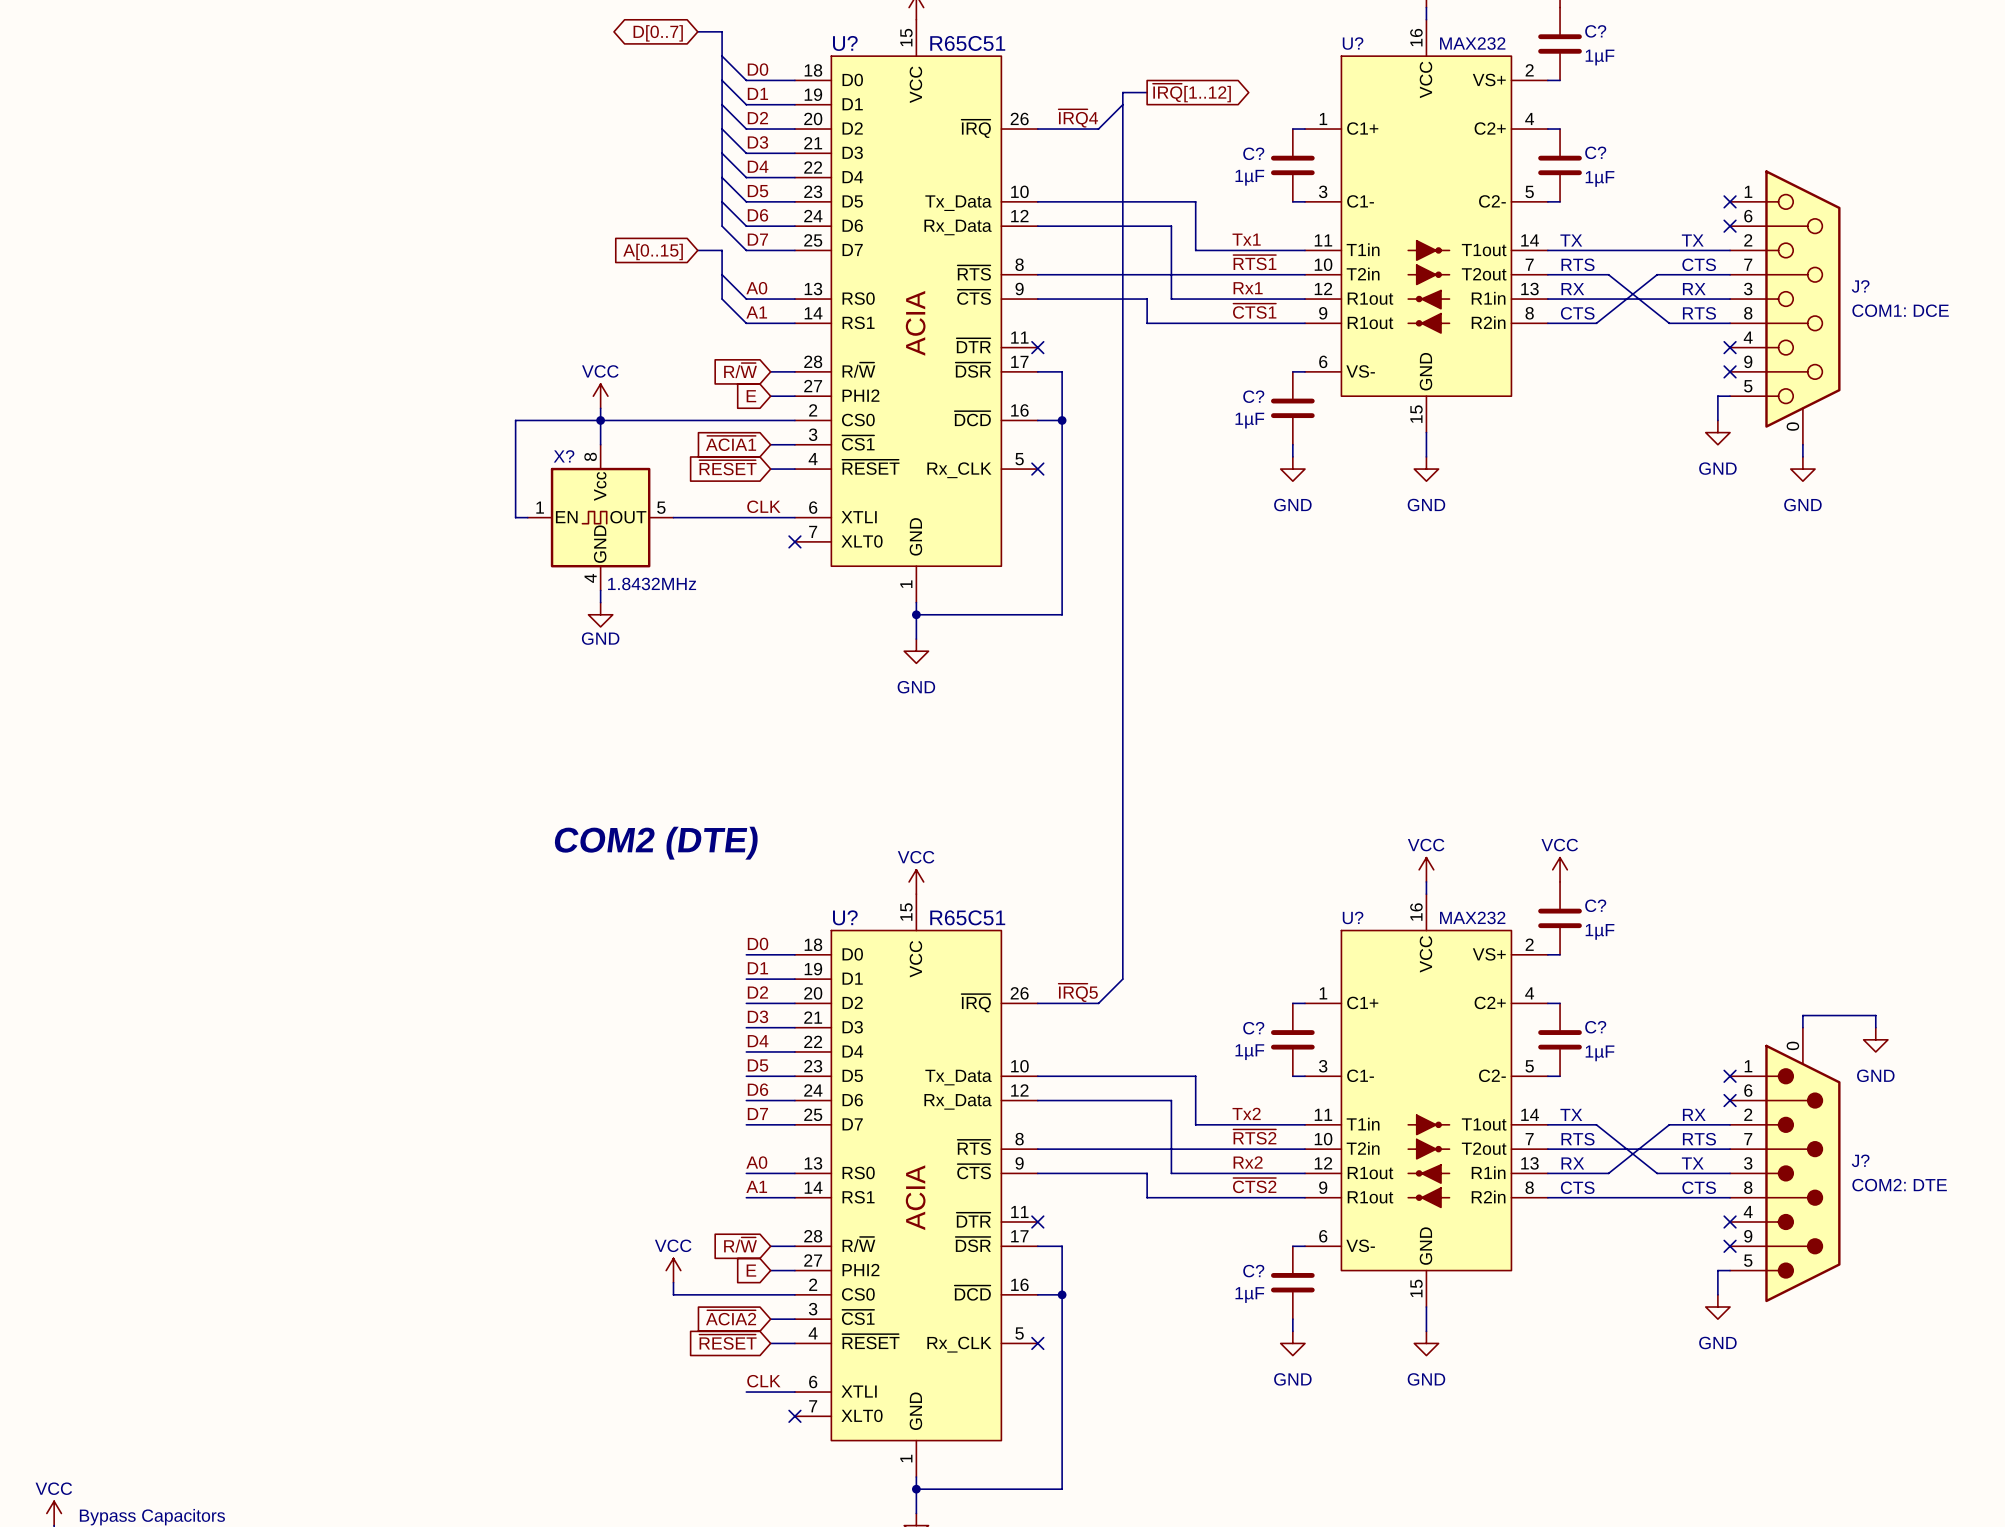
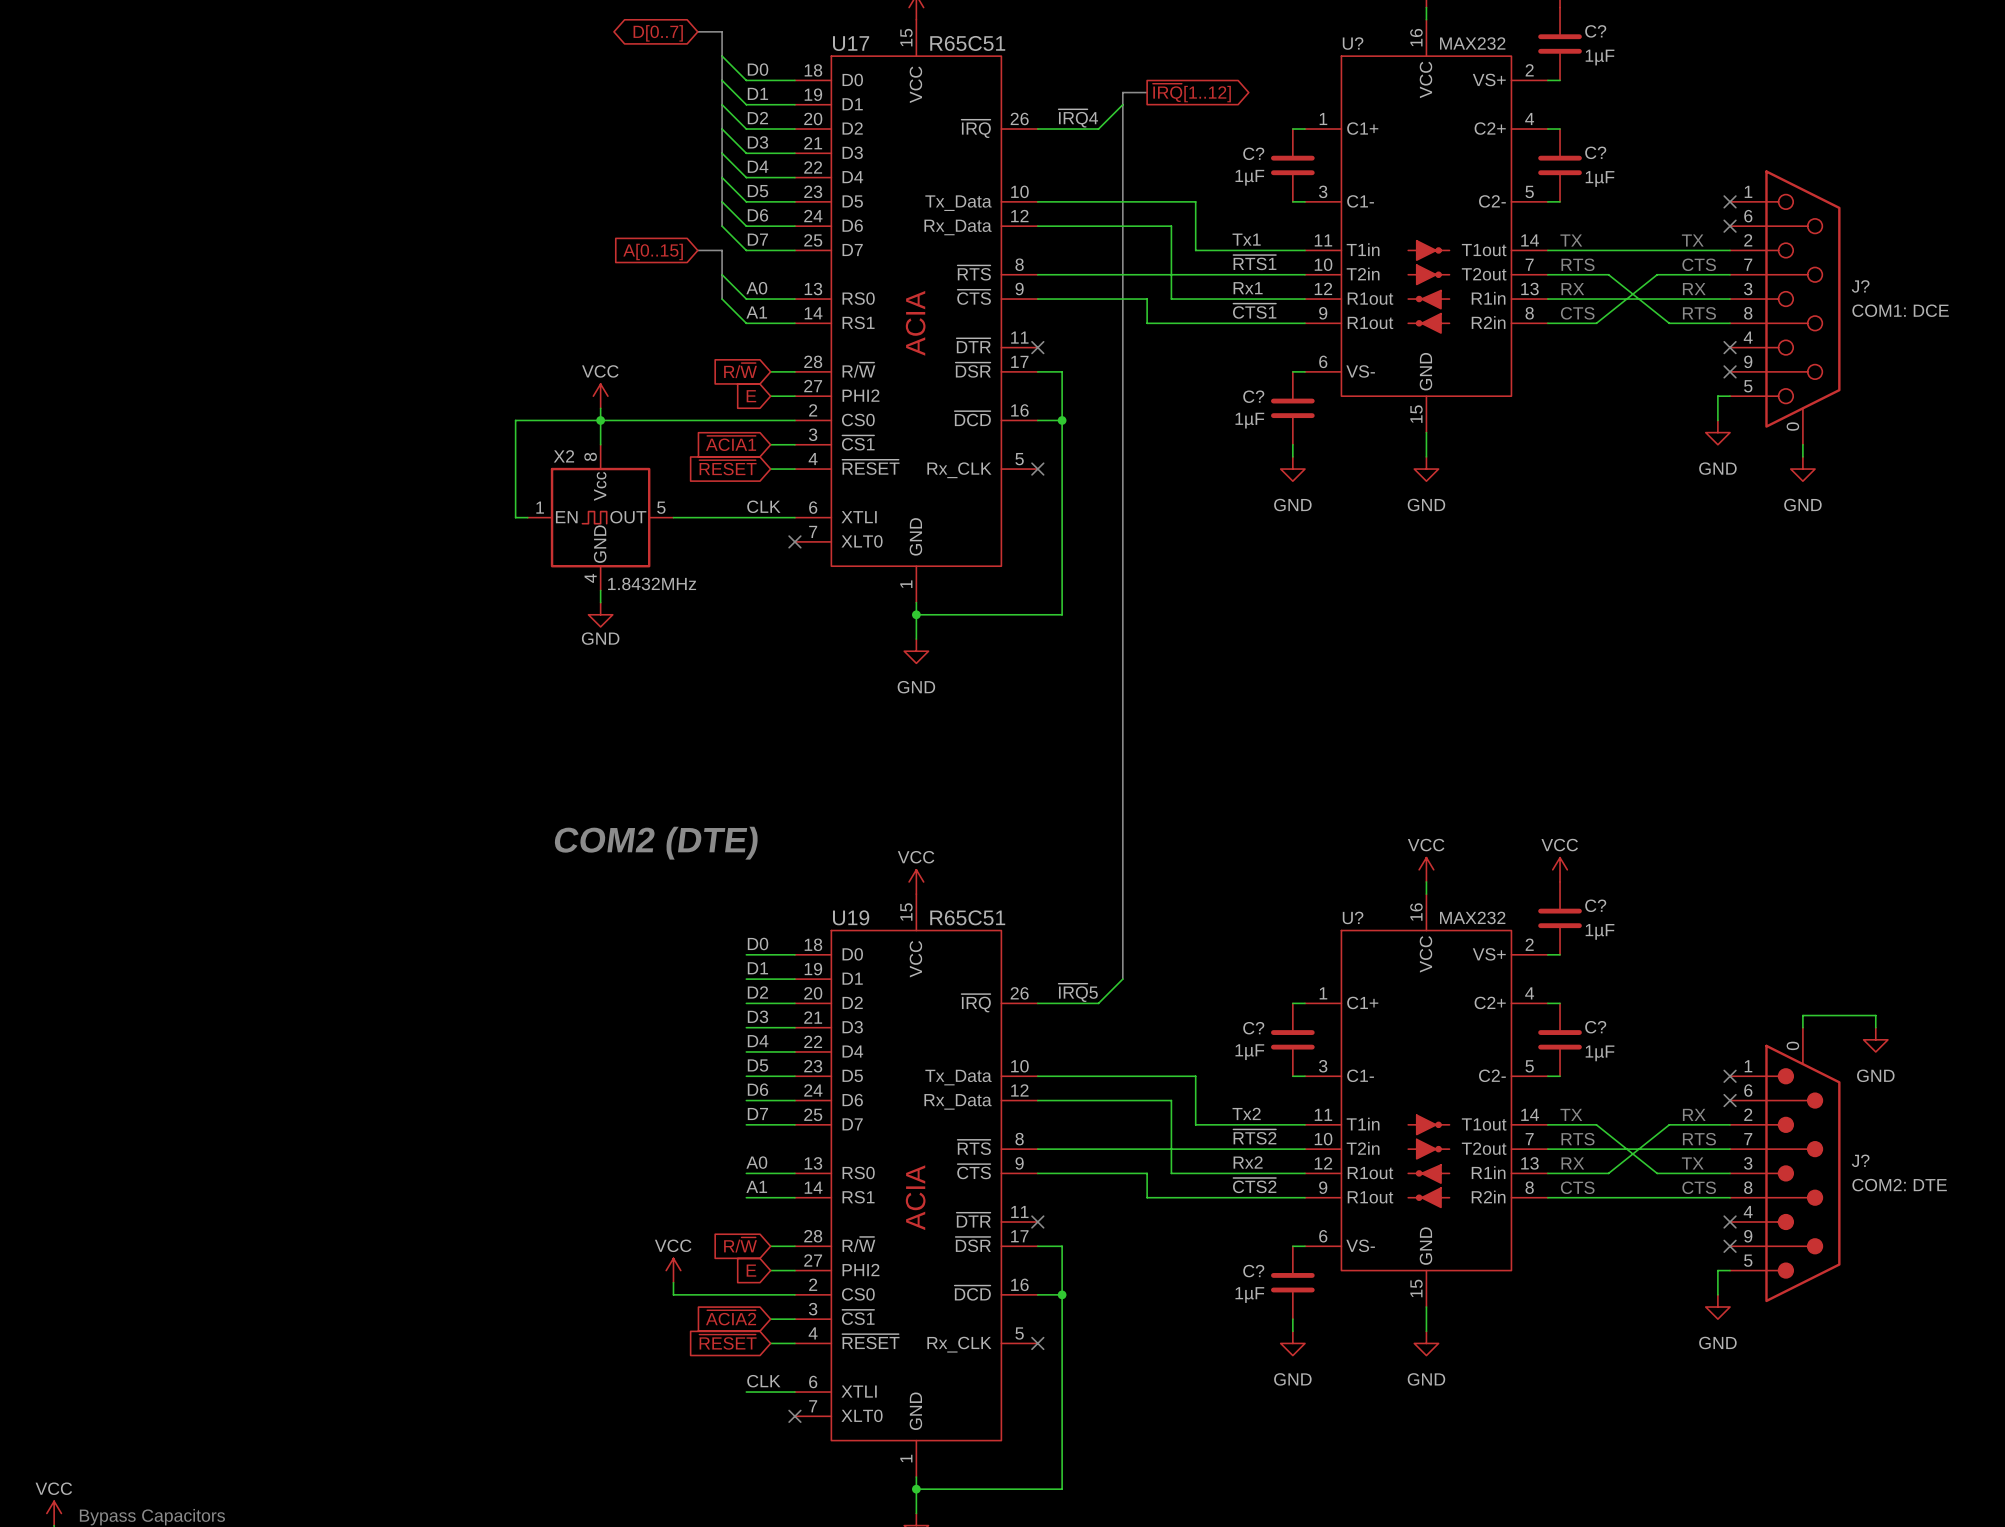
U? name: U? (845, 43) -> U17 (851, 43)
X? name: X? (564, 456) -> X2 (563, 456)
U? name: U? (845, 917) -> U19 (851, 917)

